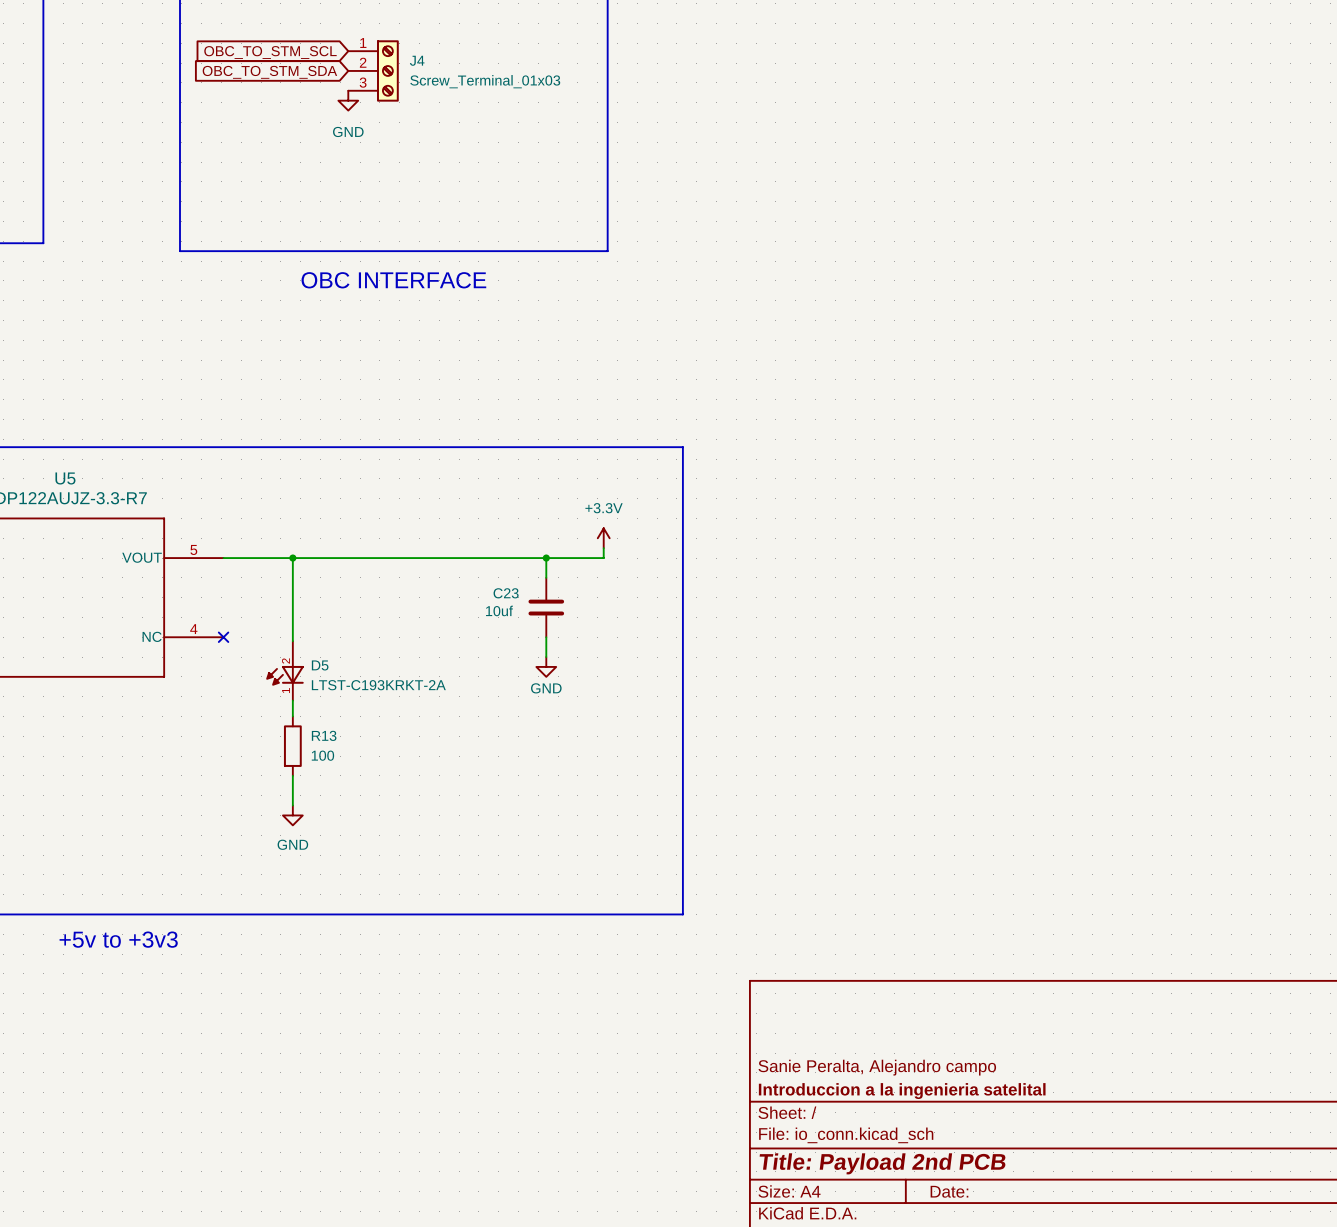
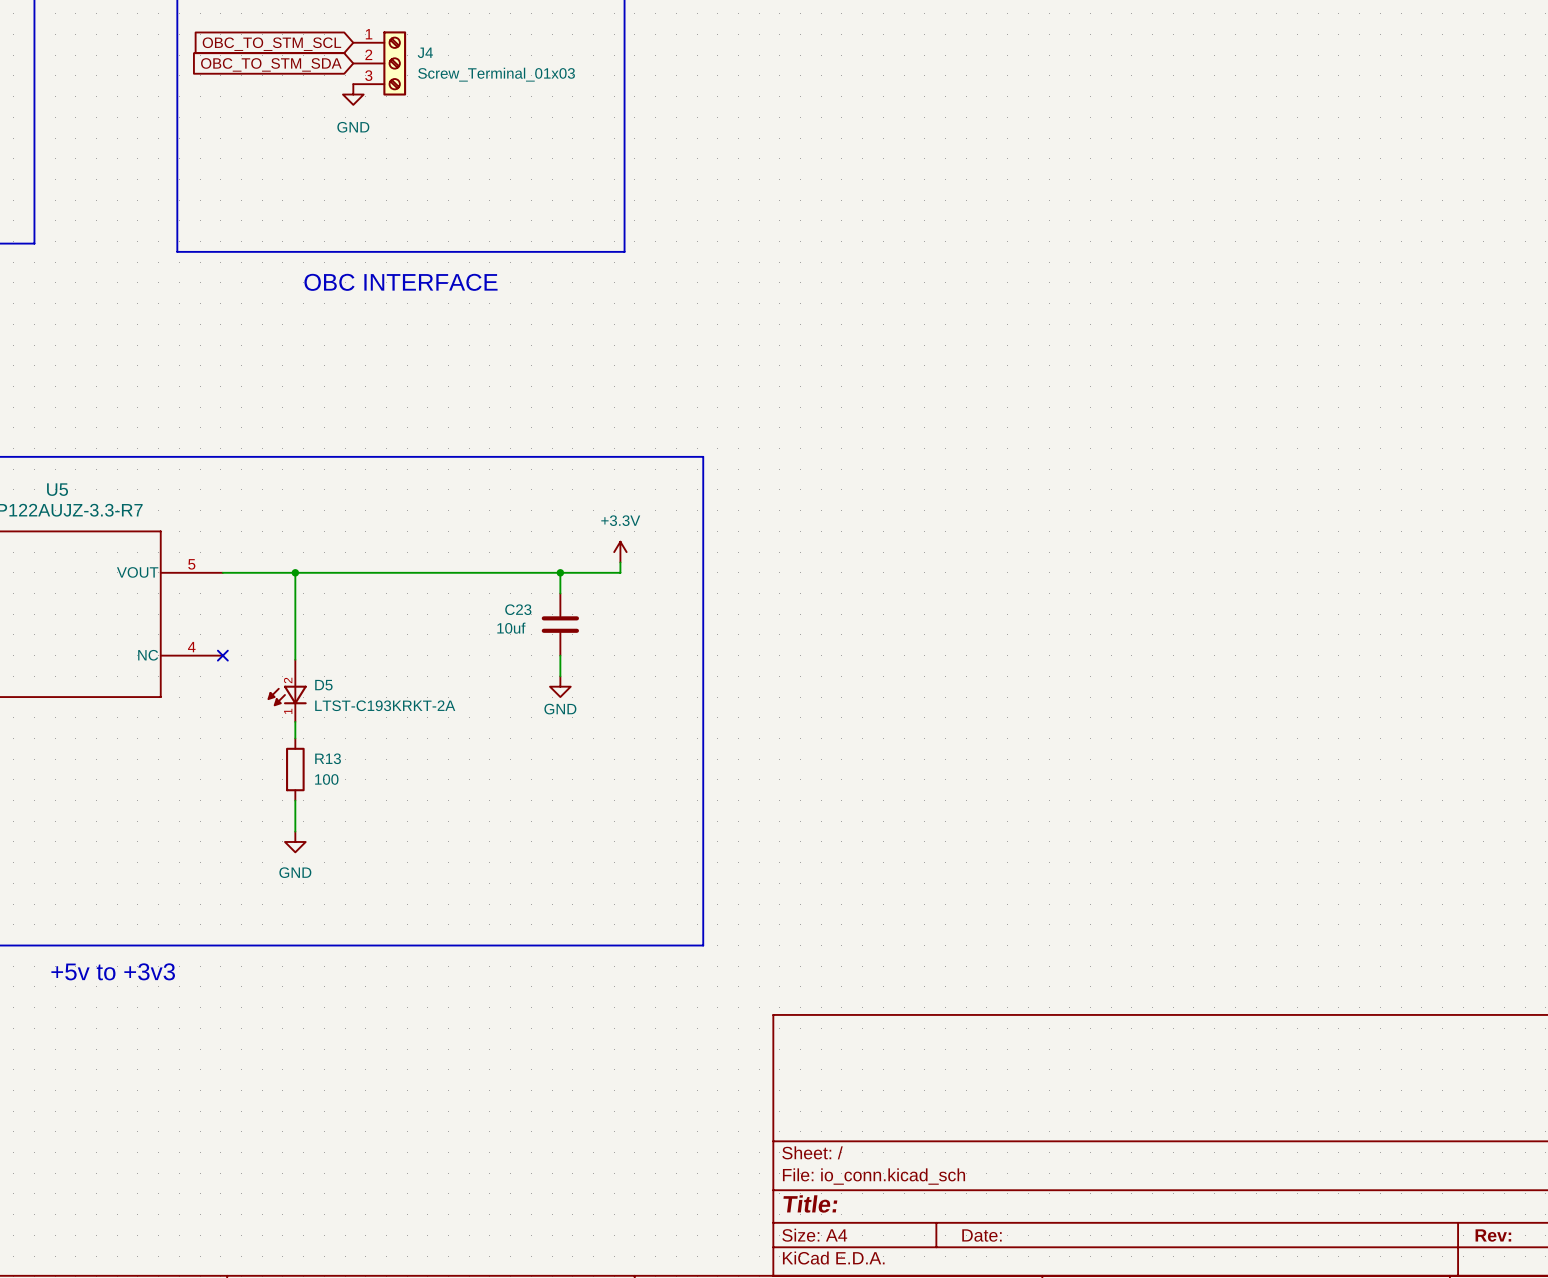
title block: Sanie Peralta, Alejandro campo (877, 1067) -> none
title block: Introduccion a la ingenieria satelital (902, 1091) -> none
title block: Title: Payload 2nd PCB (882, 1163) -> Title: (810, 1203)

